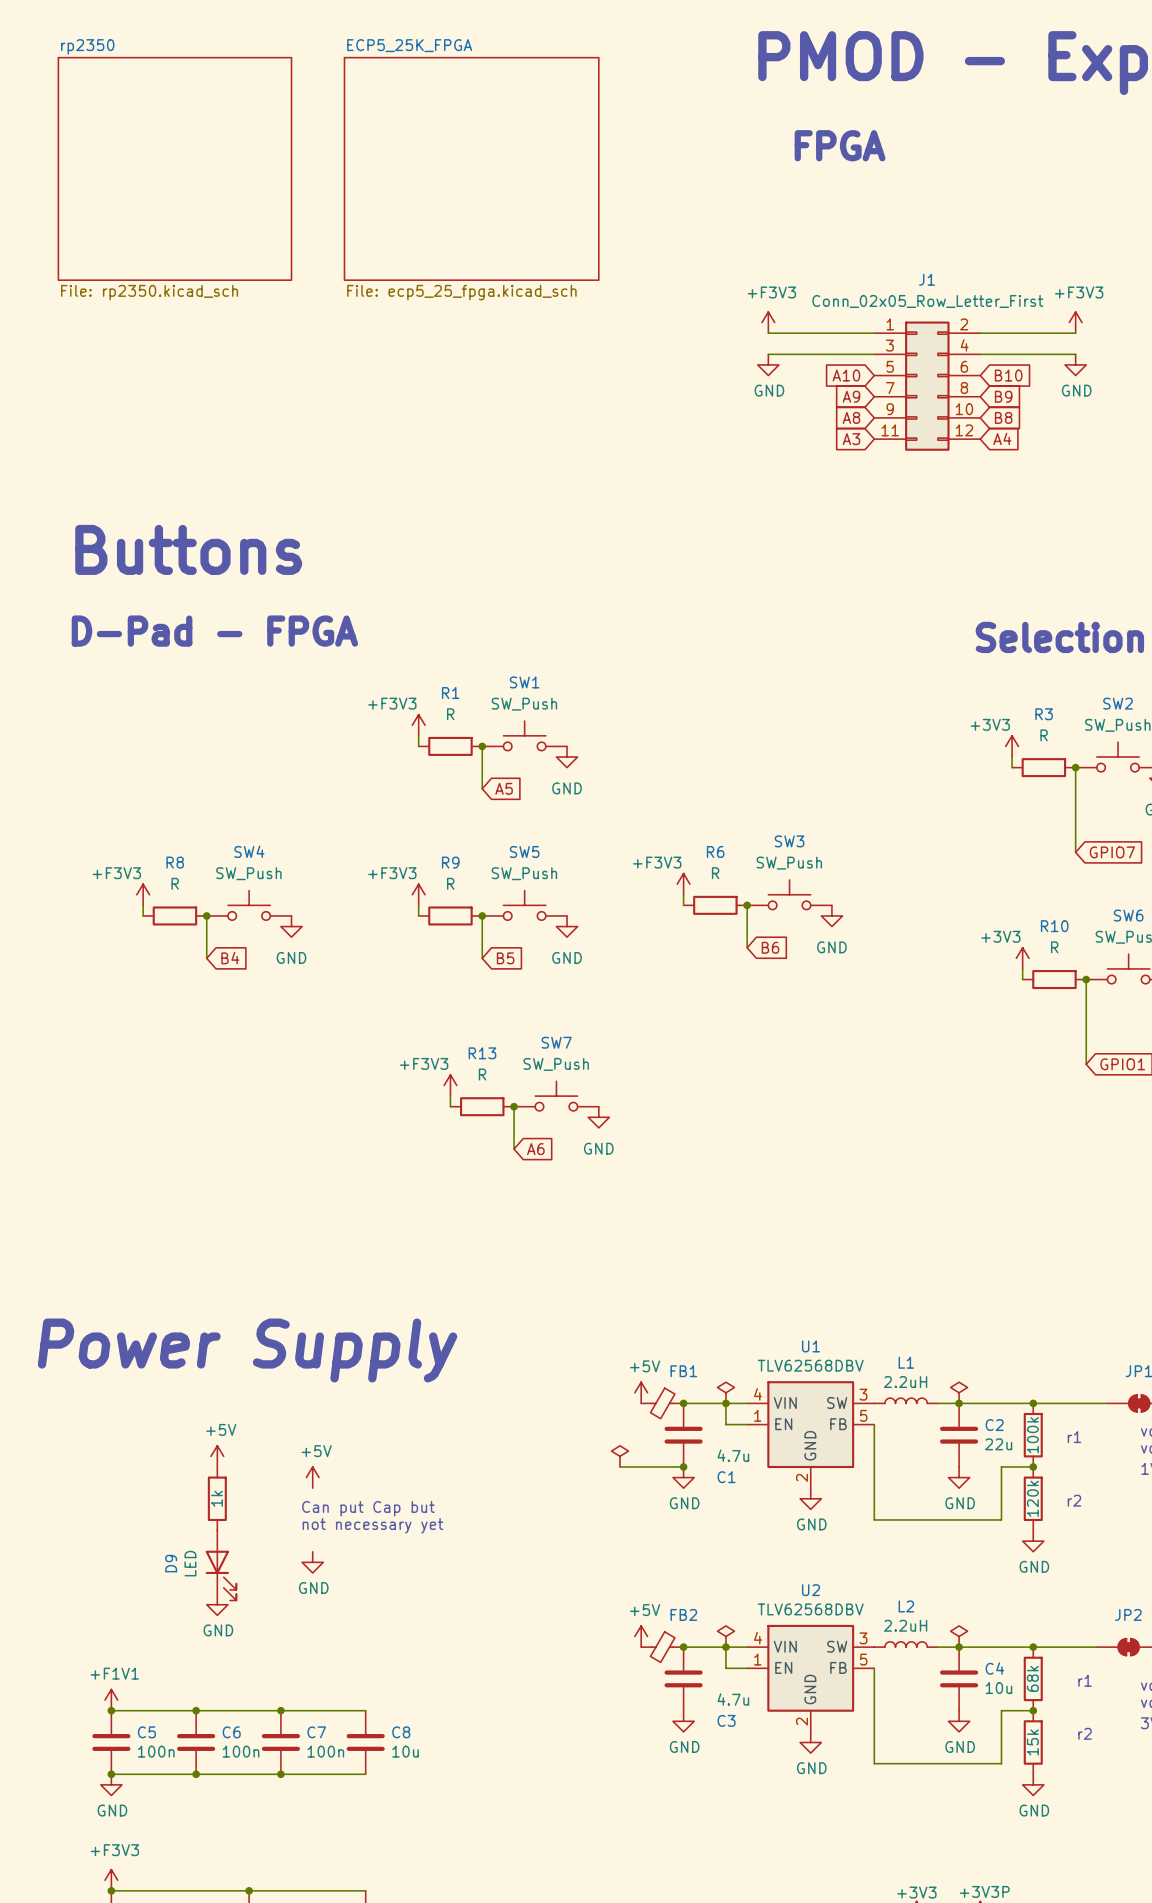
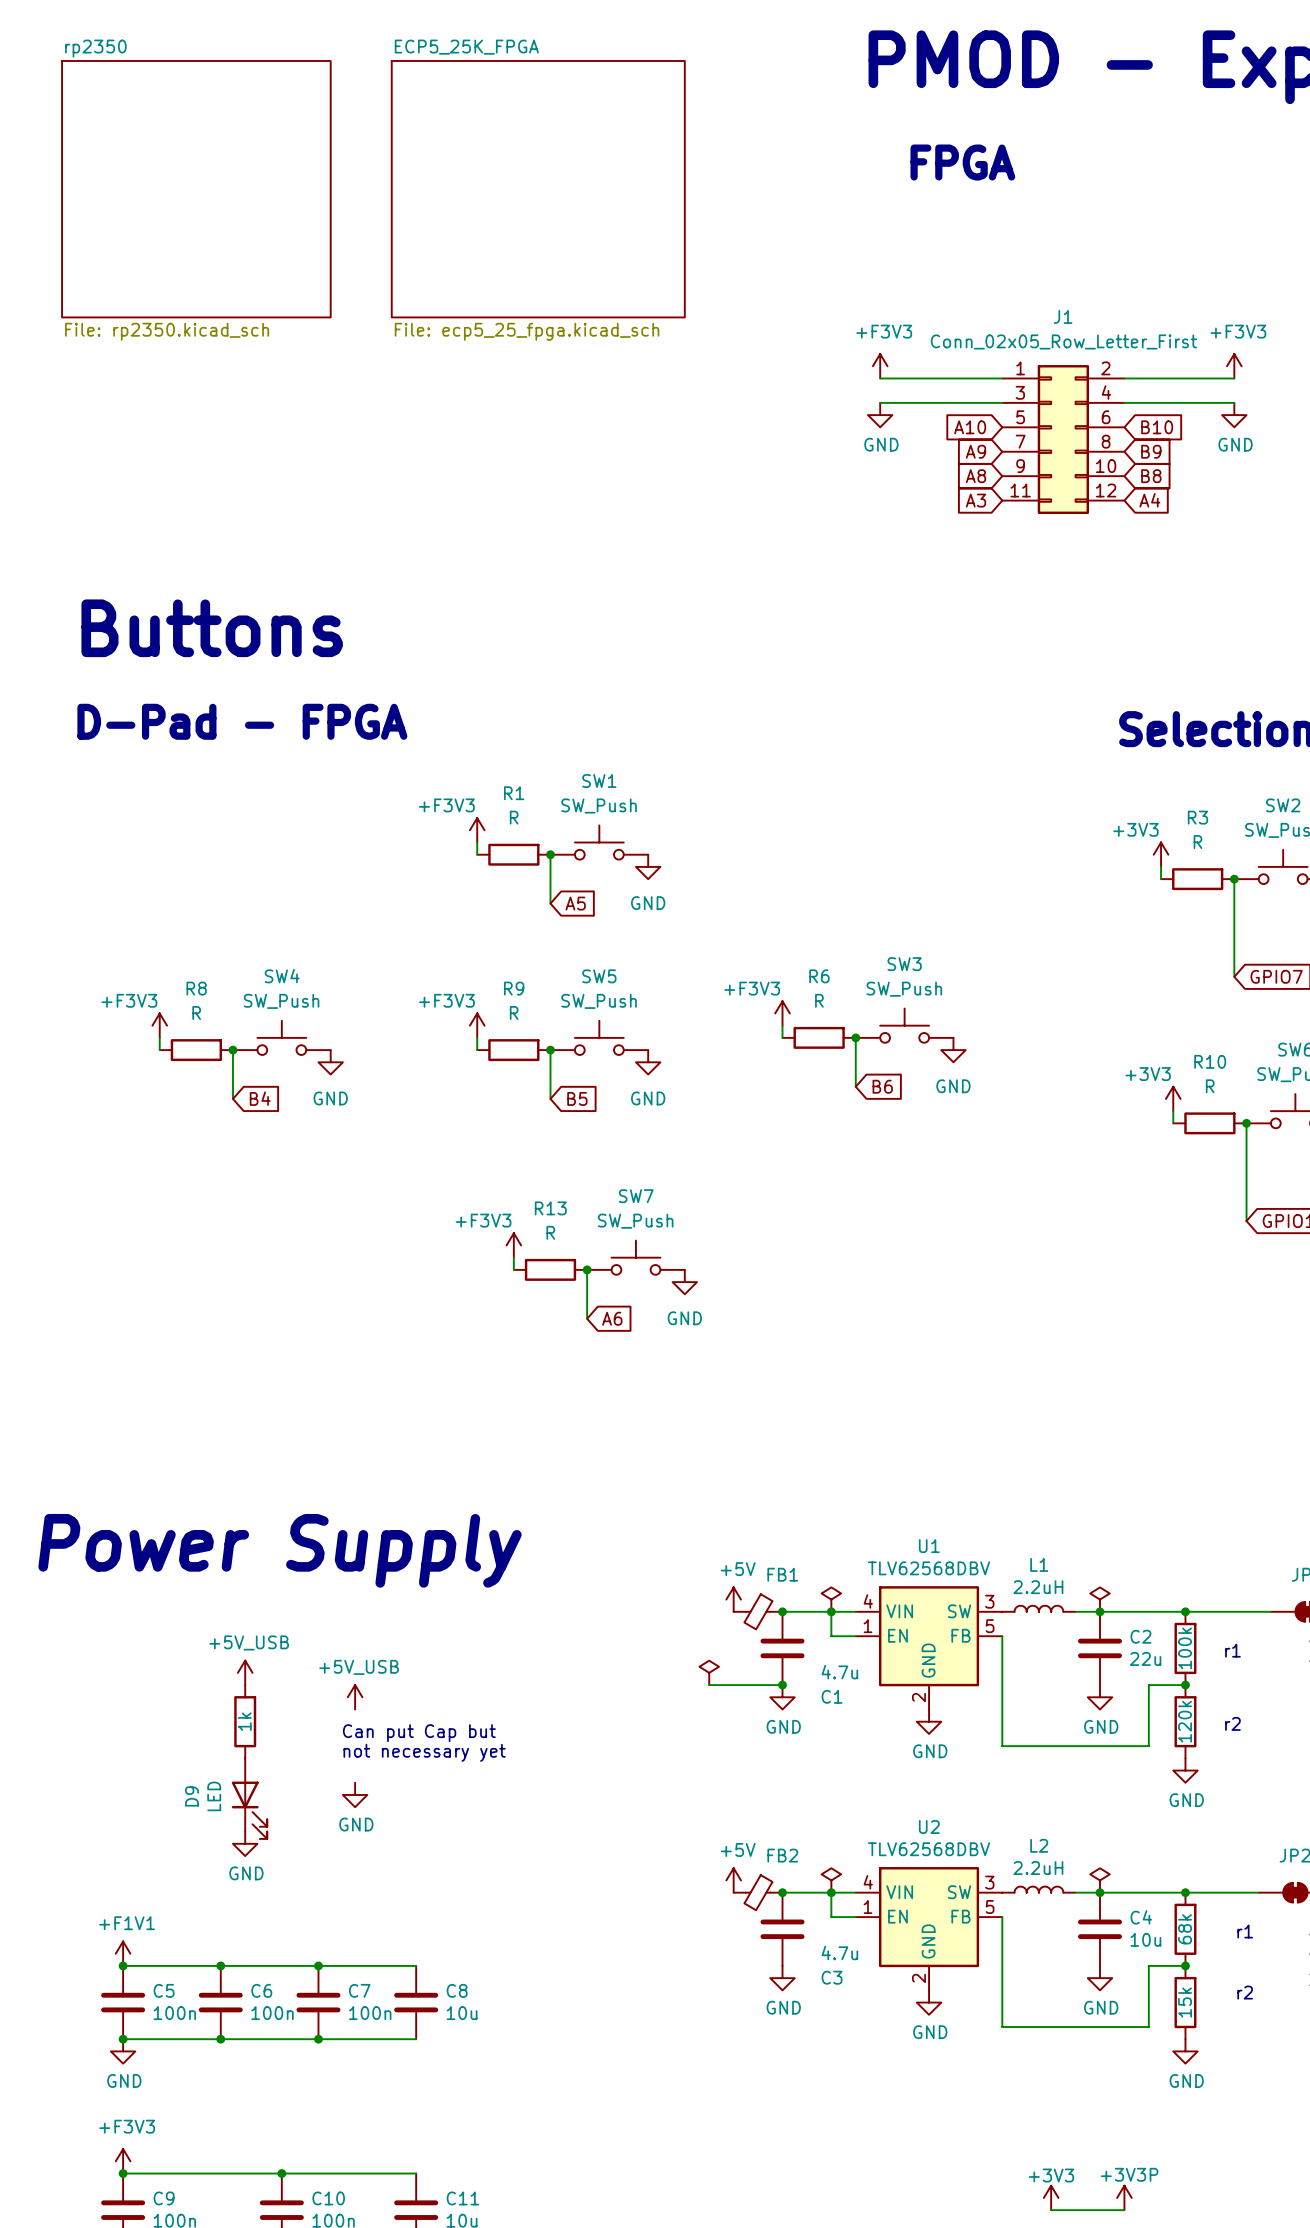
power symbol: +5V (217, 1456) -> +5V_USB (245, 1672)
power symbol: +5V (312, 1477) -> +5V_USB (355, 1697)

